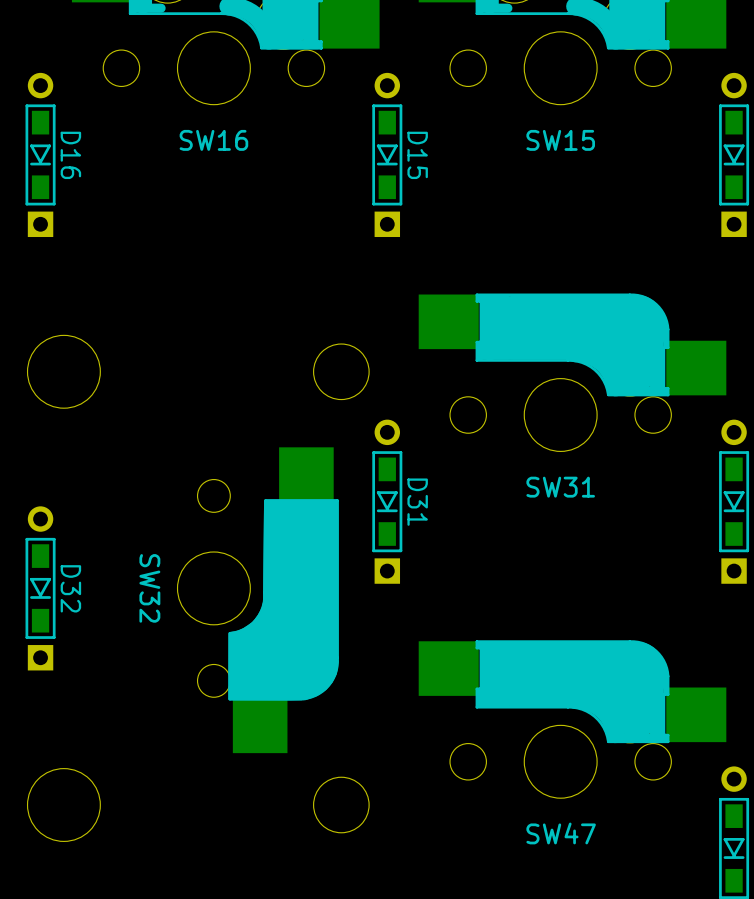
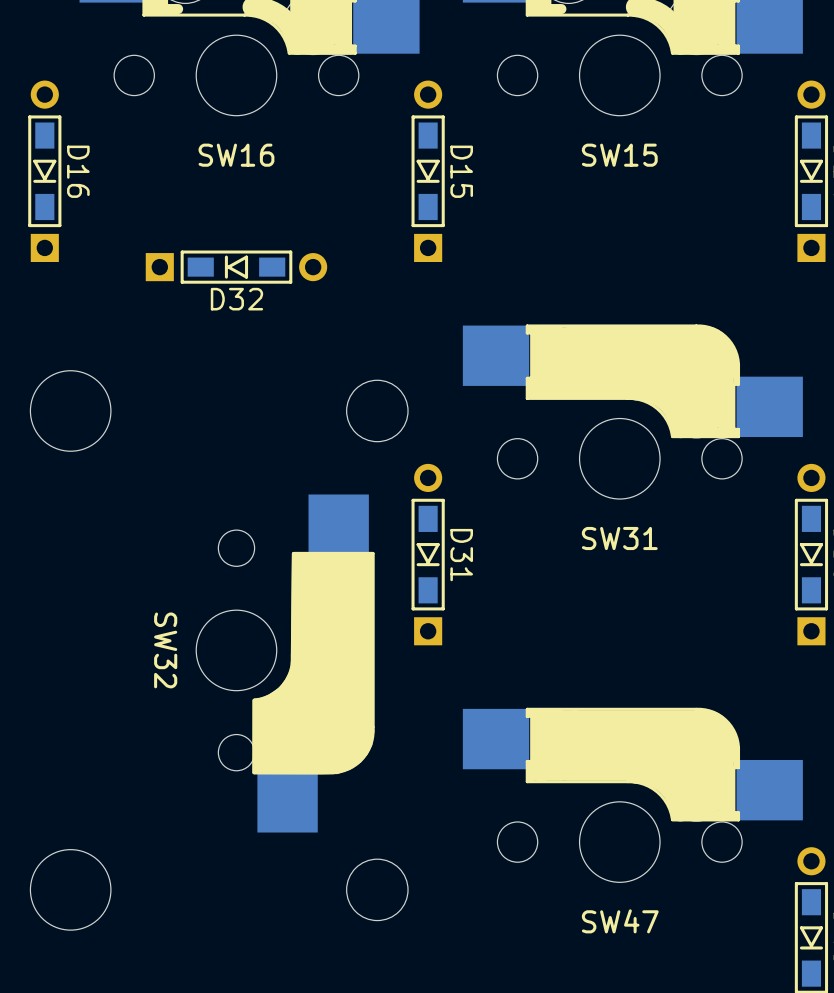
D32 rotation: 0° (40, 588) -> 90° clockwise (236, 267)
D32 position: (40, 588) -> (236, 267)

